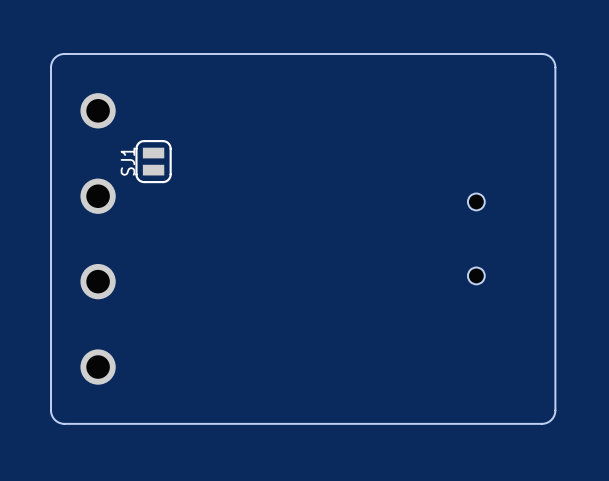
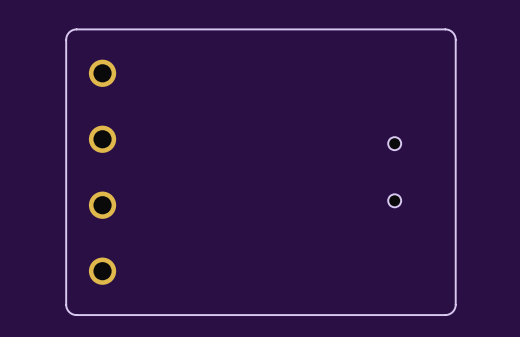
SJ1: (153, 161) -> none

